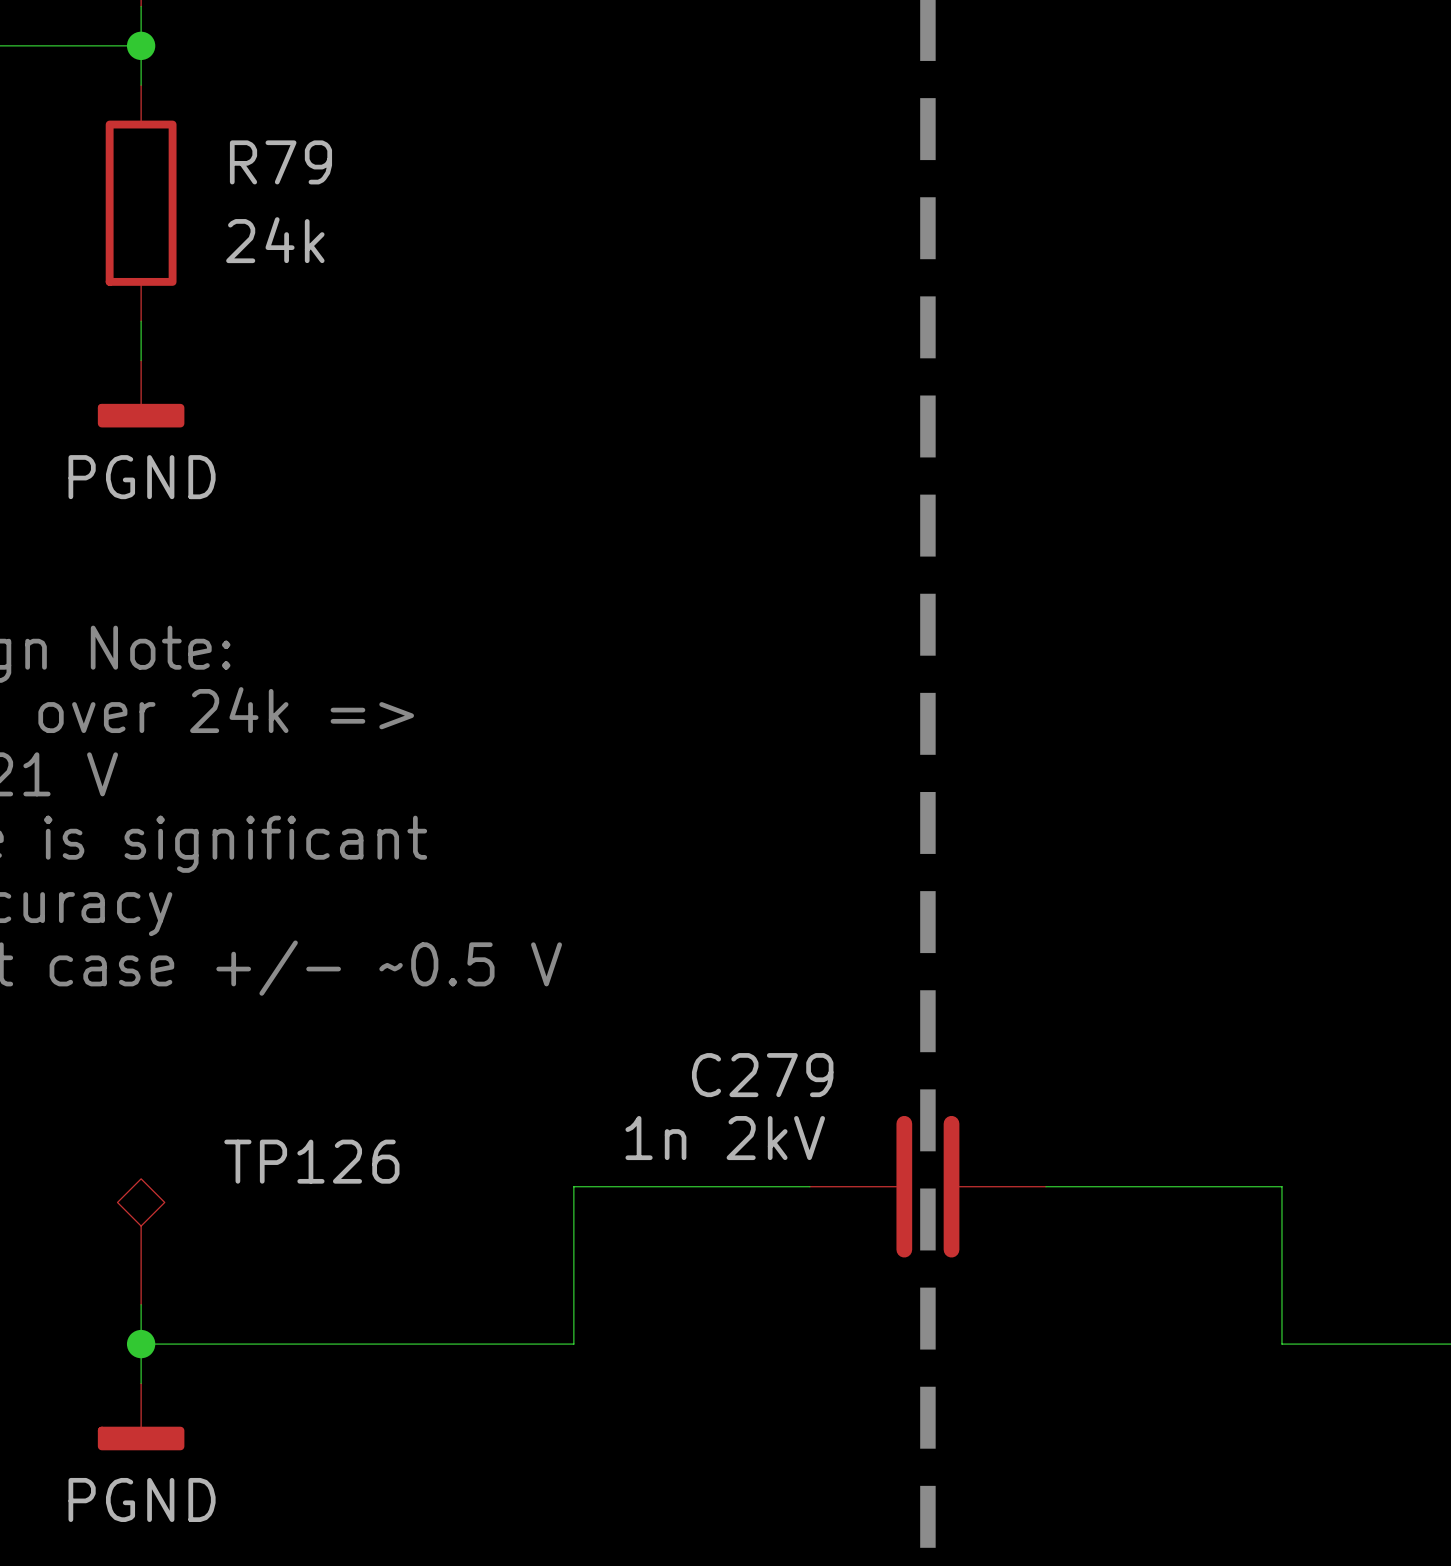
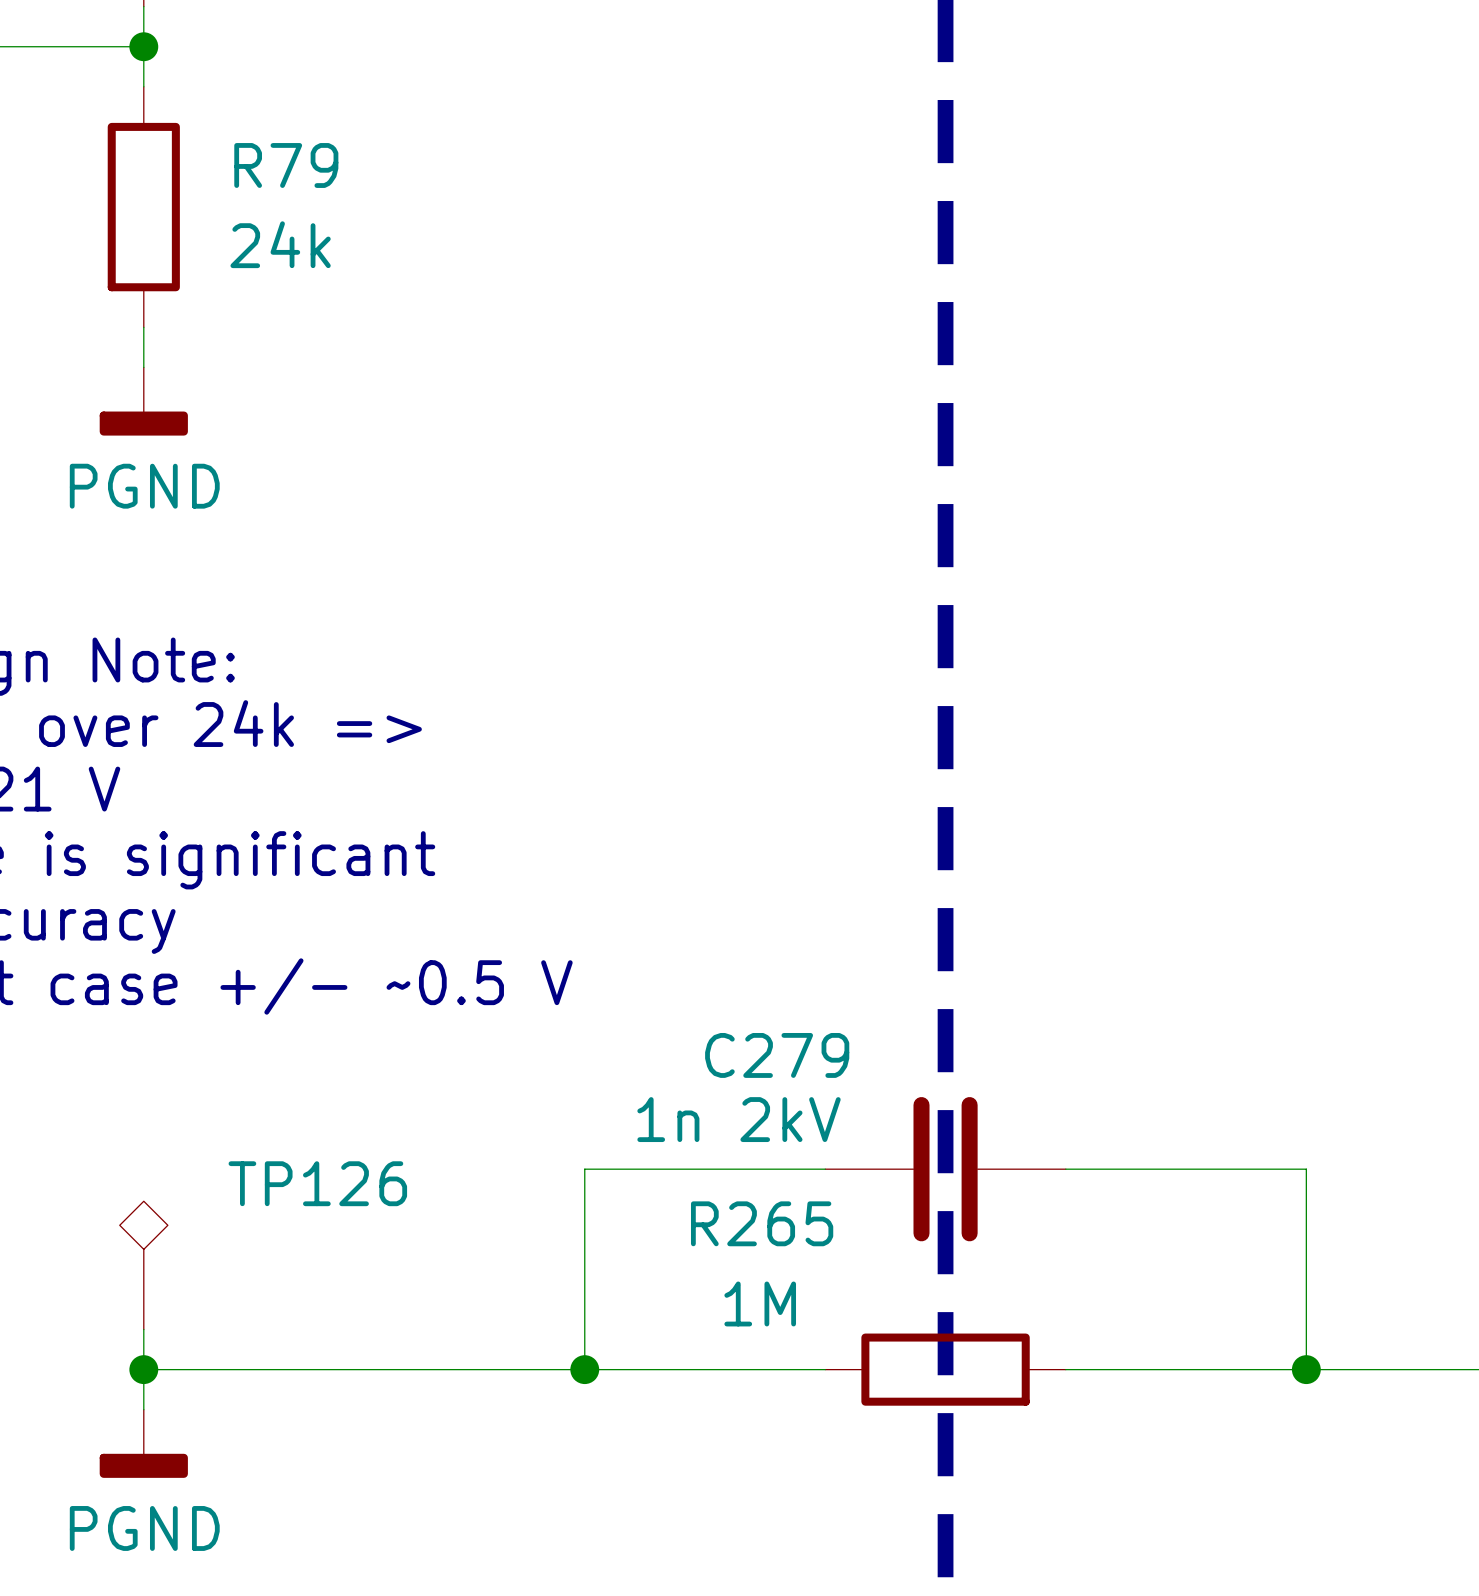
wire: (573, 1186) (809, 1186) -> (584, 1209) (584, 1169) (825, 1169)
C279 position: (927, 1186) -> (945, 1169)
wire: (1045, 1186) (1281, 1186) -> (1065, 1169) (1306, 1169) (1306, 1209)
wire: none -> (584, 1369) (825, 1369)
junction: none -> (584, 1369)
R265: none -> 1M (945, 1369)
wire: none -> (1065, 1369) (1306, 1369)
junction: none -> (1306, 1369)

